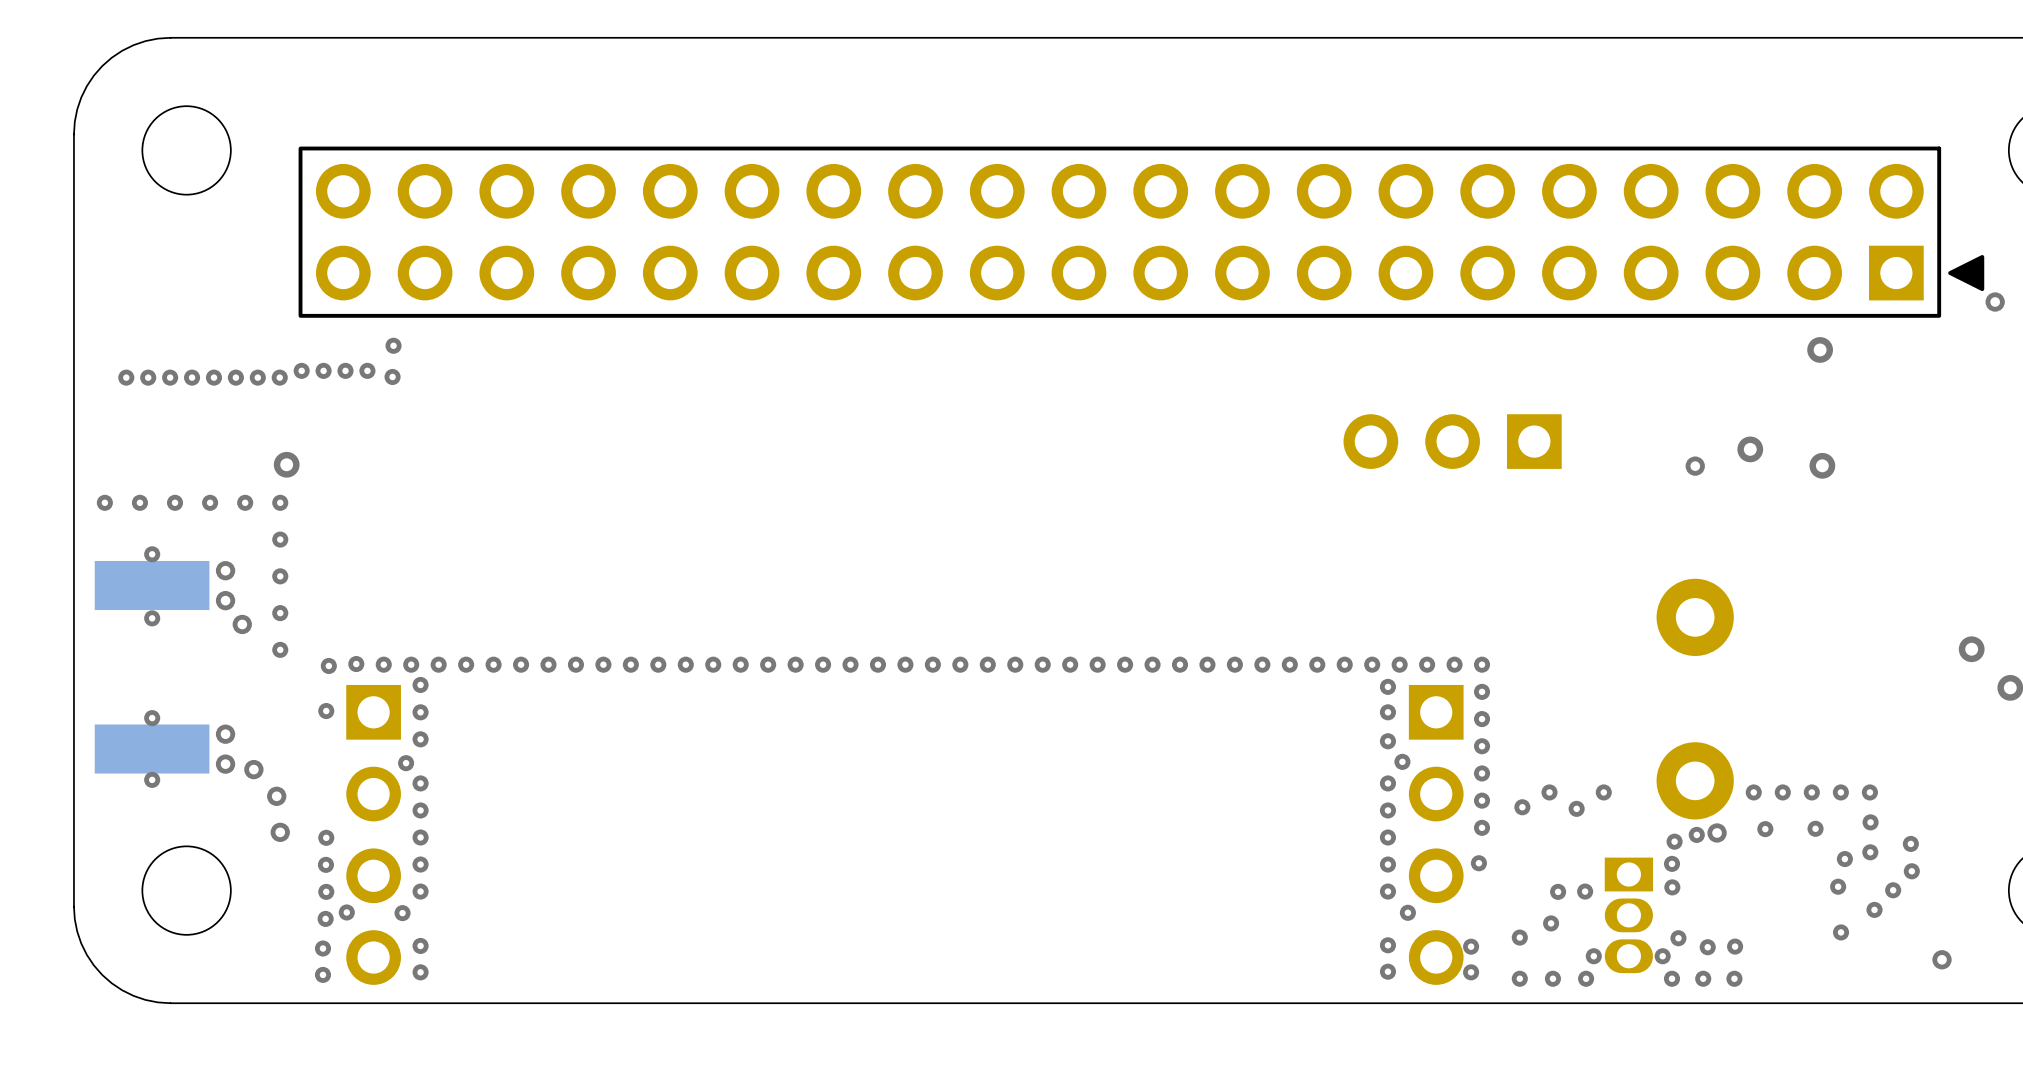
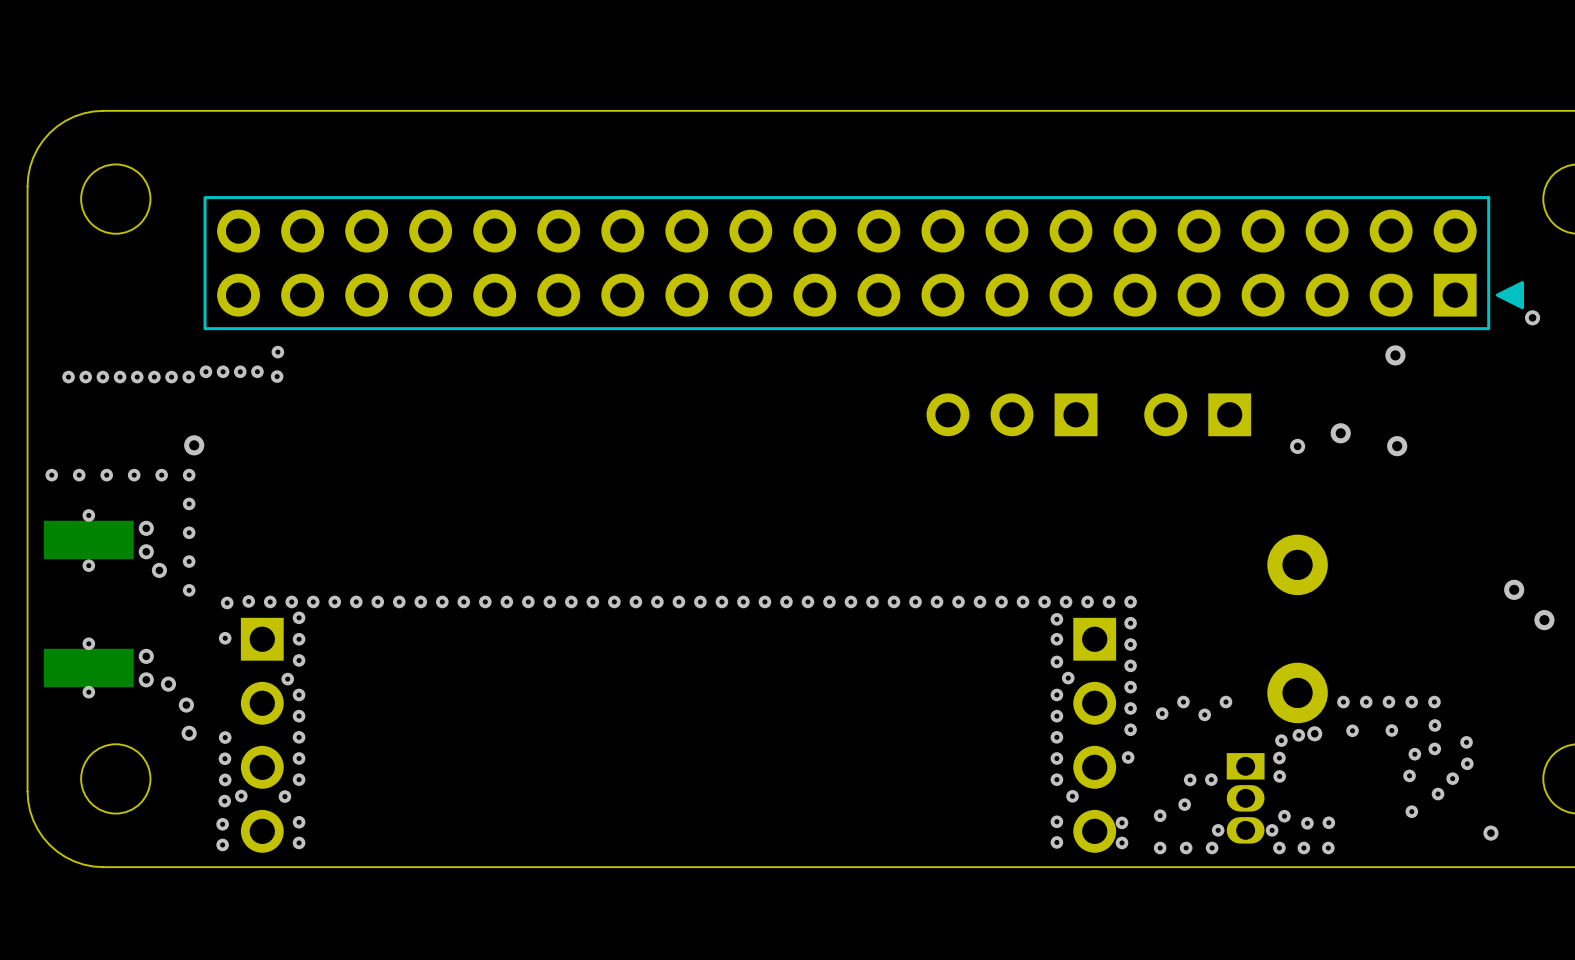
part: none -> (1197, 414)
part position: (1452, 441) -> (1012, 414)

